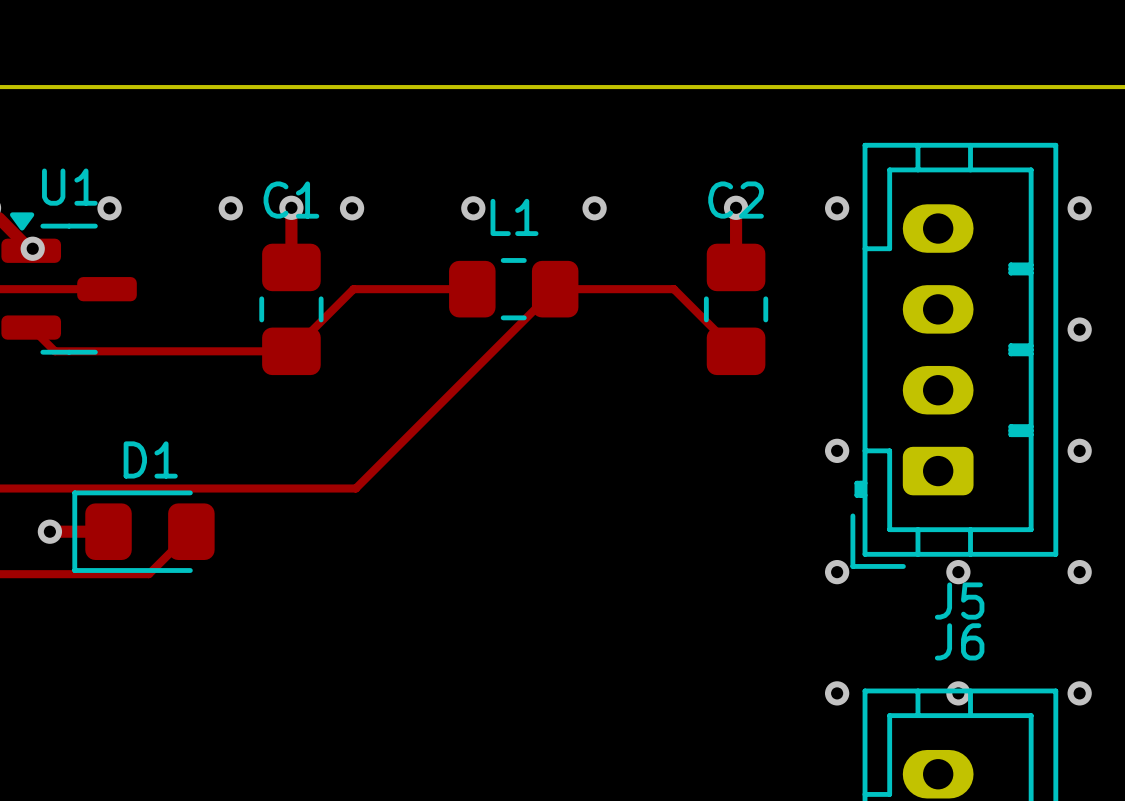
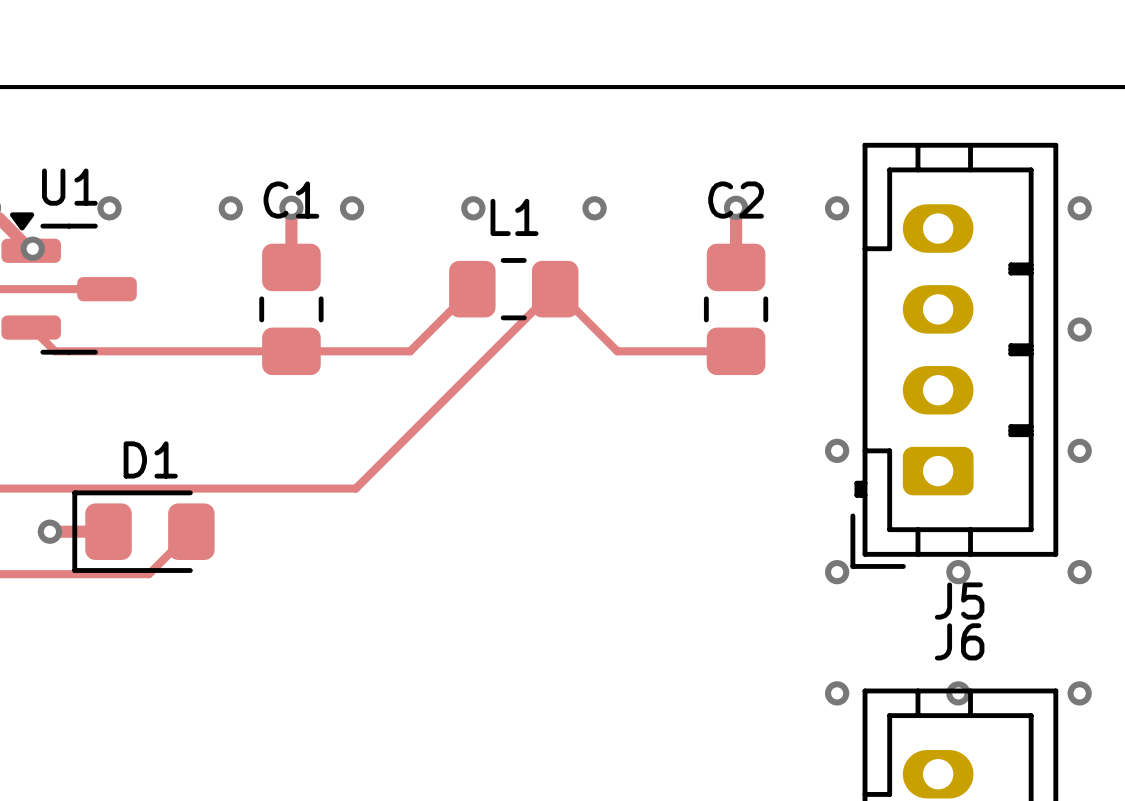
track: (472, 289) (353, 289) (291, 351) -> (472, 289) (410, 351) (291, 351)
track: (555, 289) (673, 289) (736, 351) -> (555, 289) (617, 351) (736, 351)

